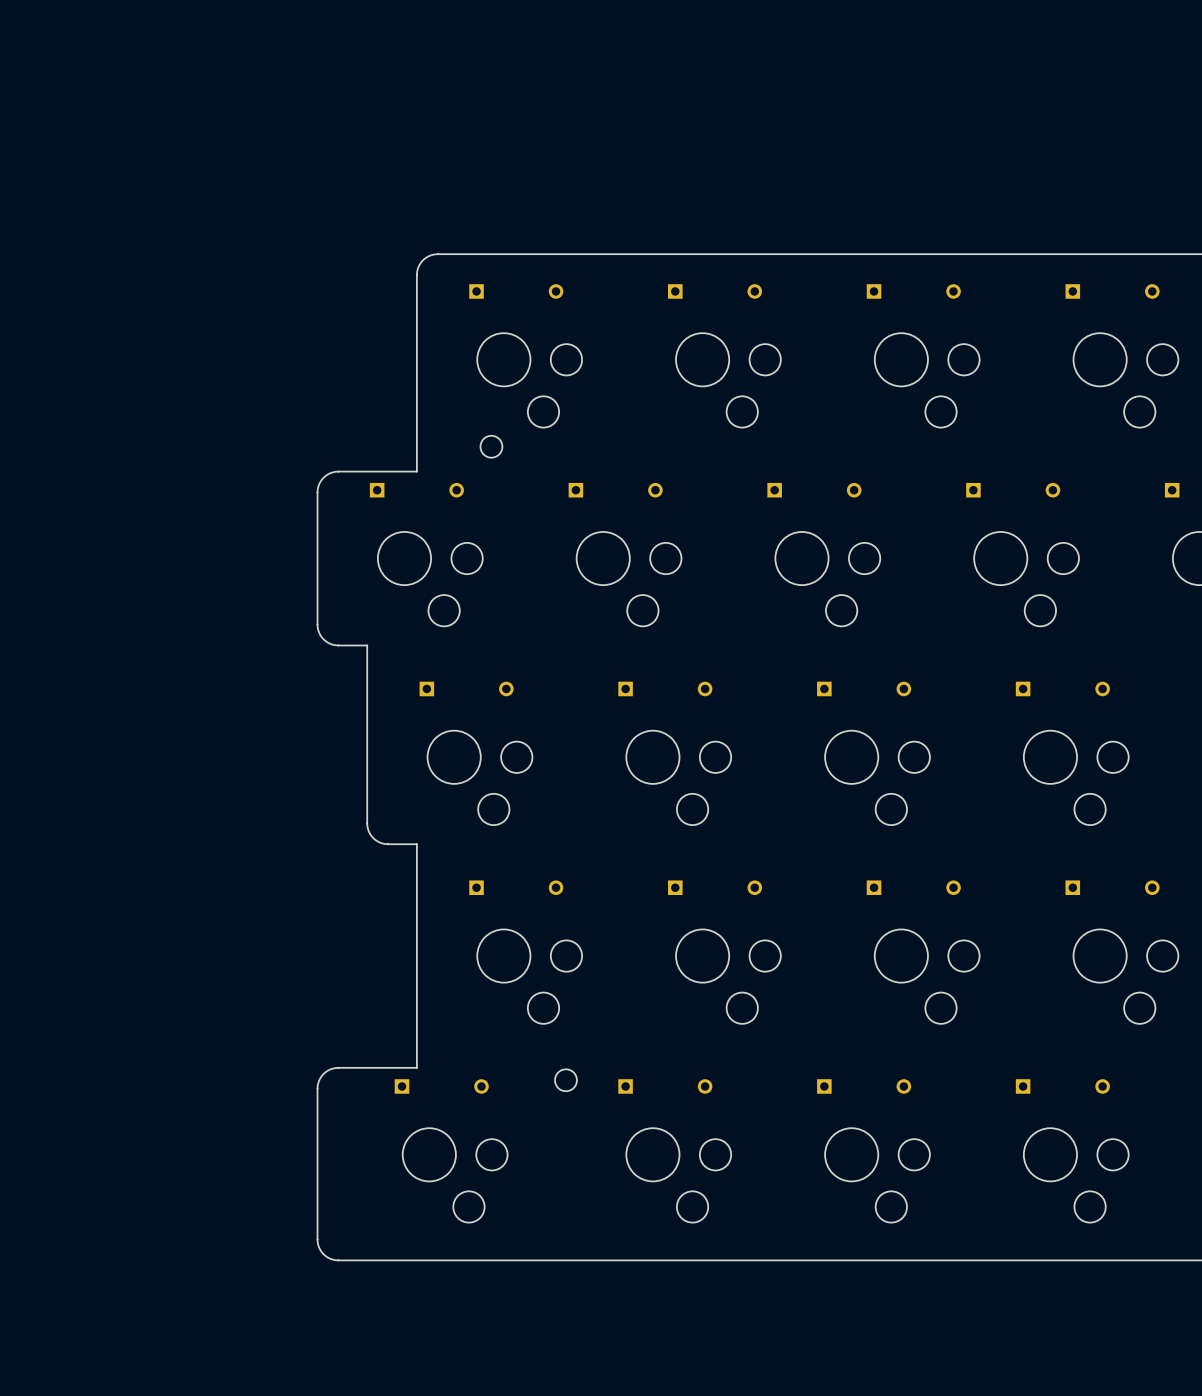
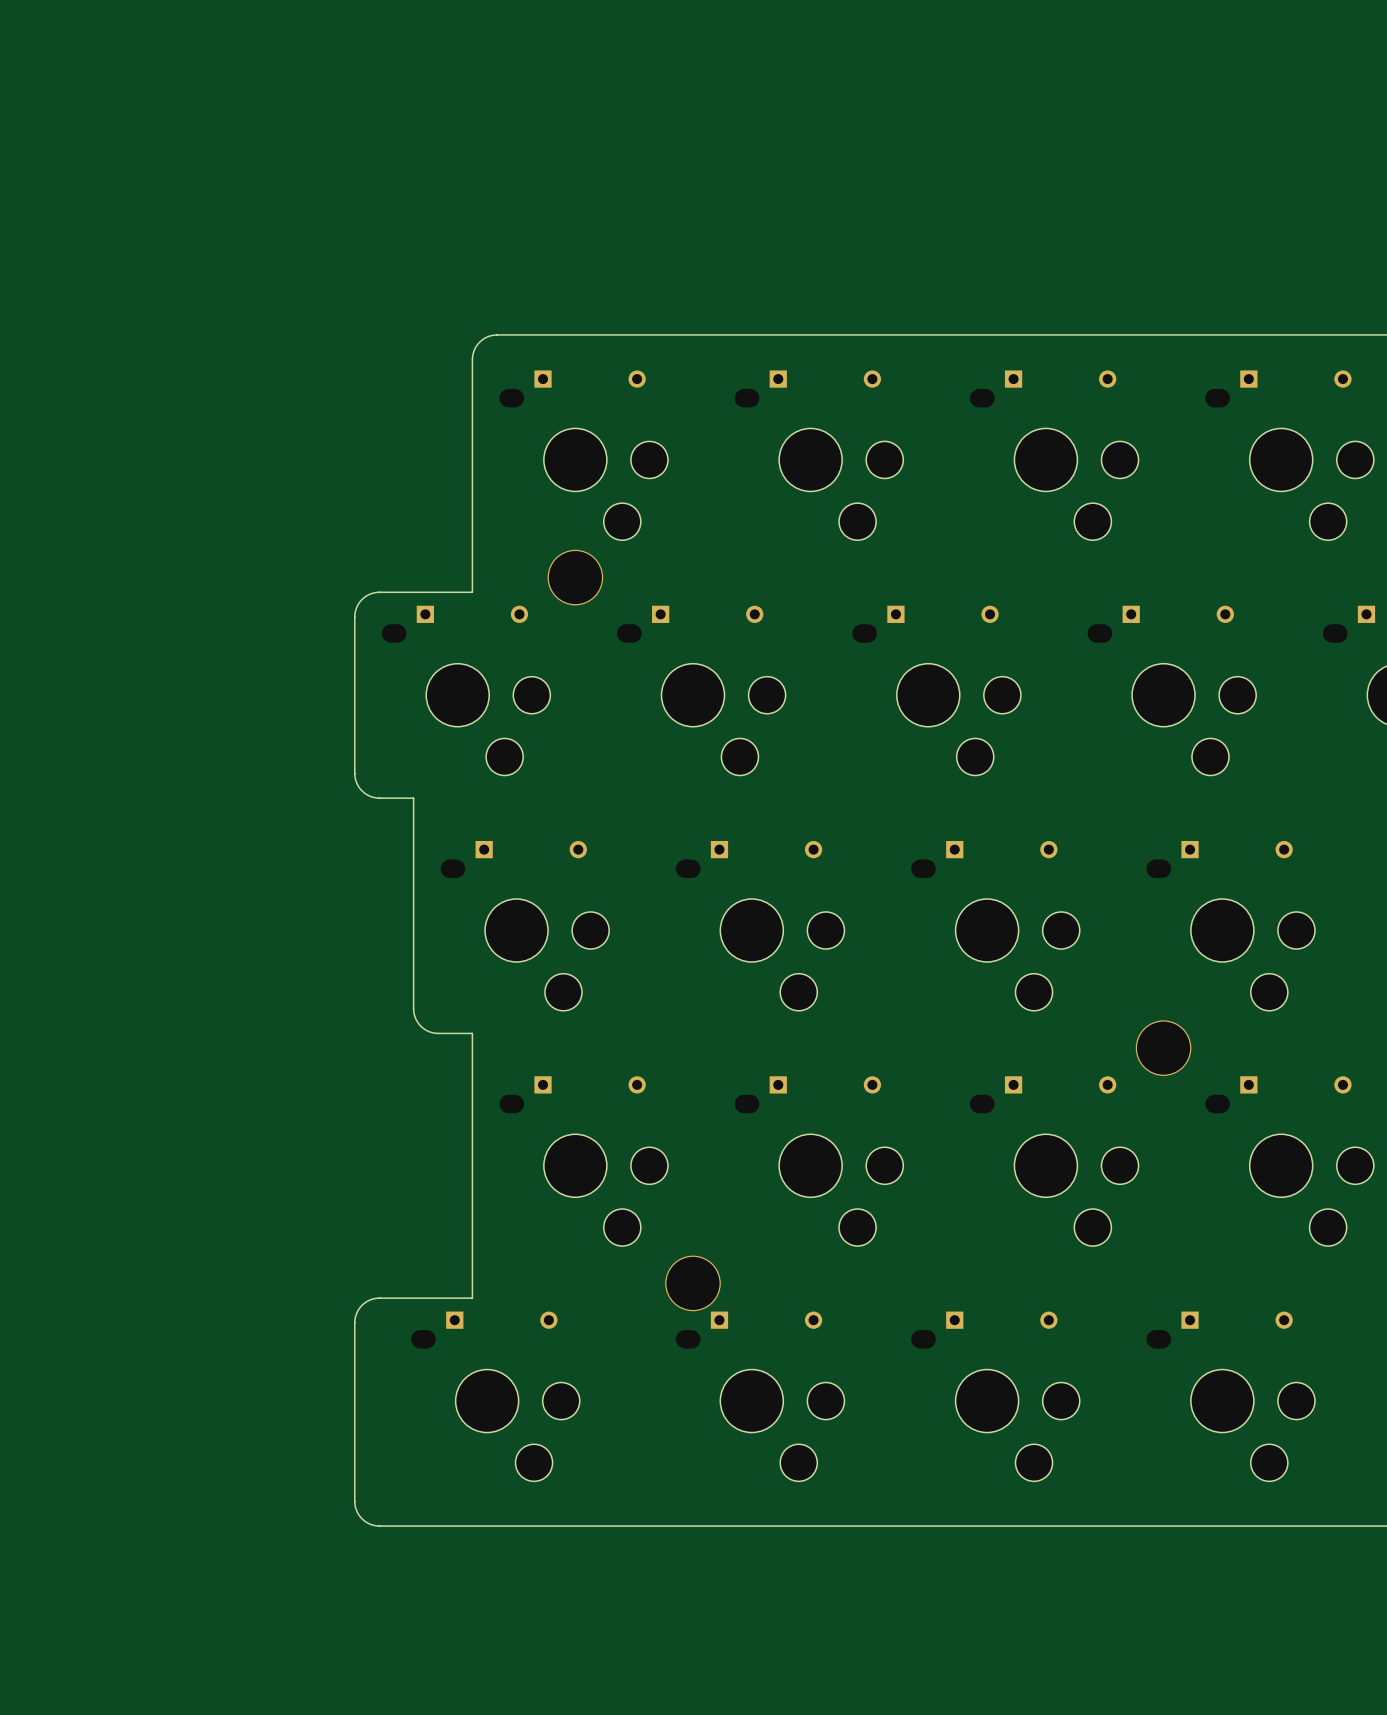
round board edge: [480, 435, 503, 458] -> none
part: none -> (575, 577)
part: none -> (1163, 1048)
part: none -> (693, 1283)
round board edge: [554, 1069, 578, 1092] -> none

